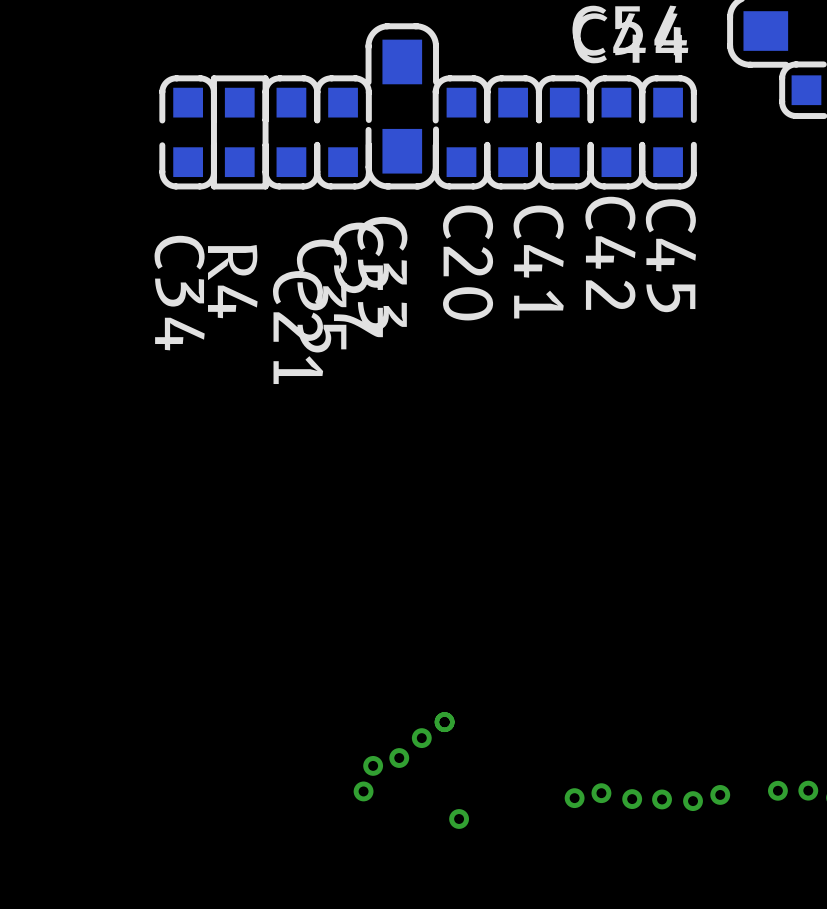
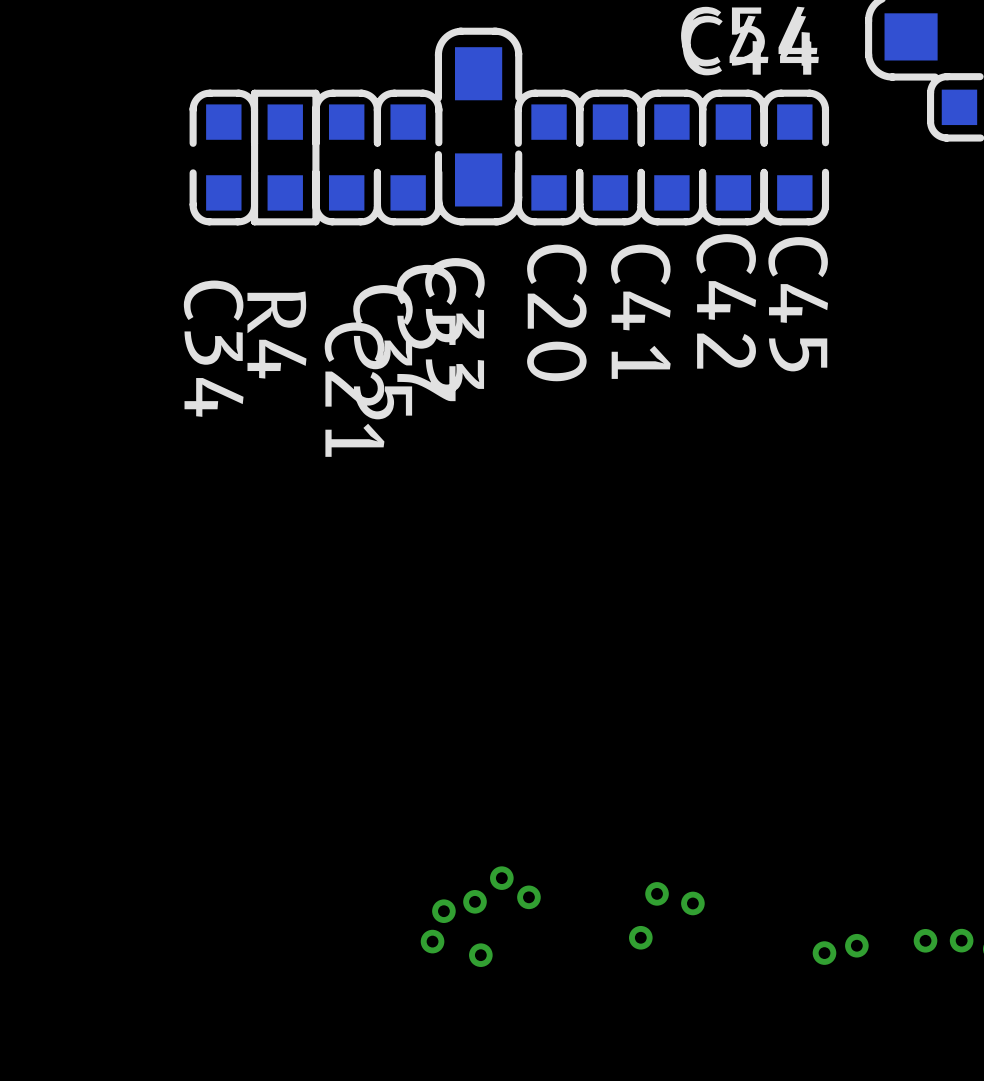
via position: (444, 722) -> (528, 897)
via: none -> (657, 893)
via: none -> (692, 903)
via: none -> (640, 937)
via: (601, 793) -> none
via: (574, 798) -> none
via: (632, 799) -> none
via: (662, 799) -> none
via: none -> (480, 955)
via: (459, 818) -> none

